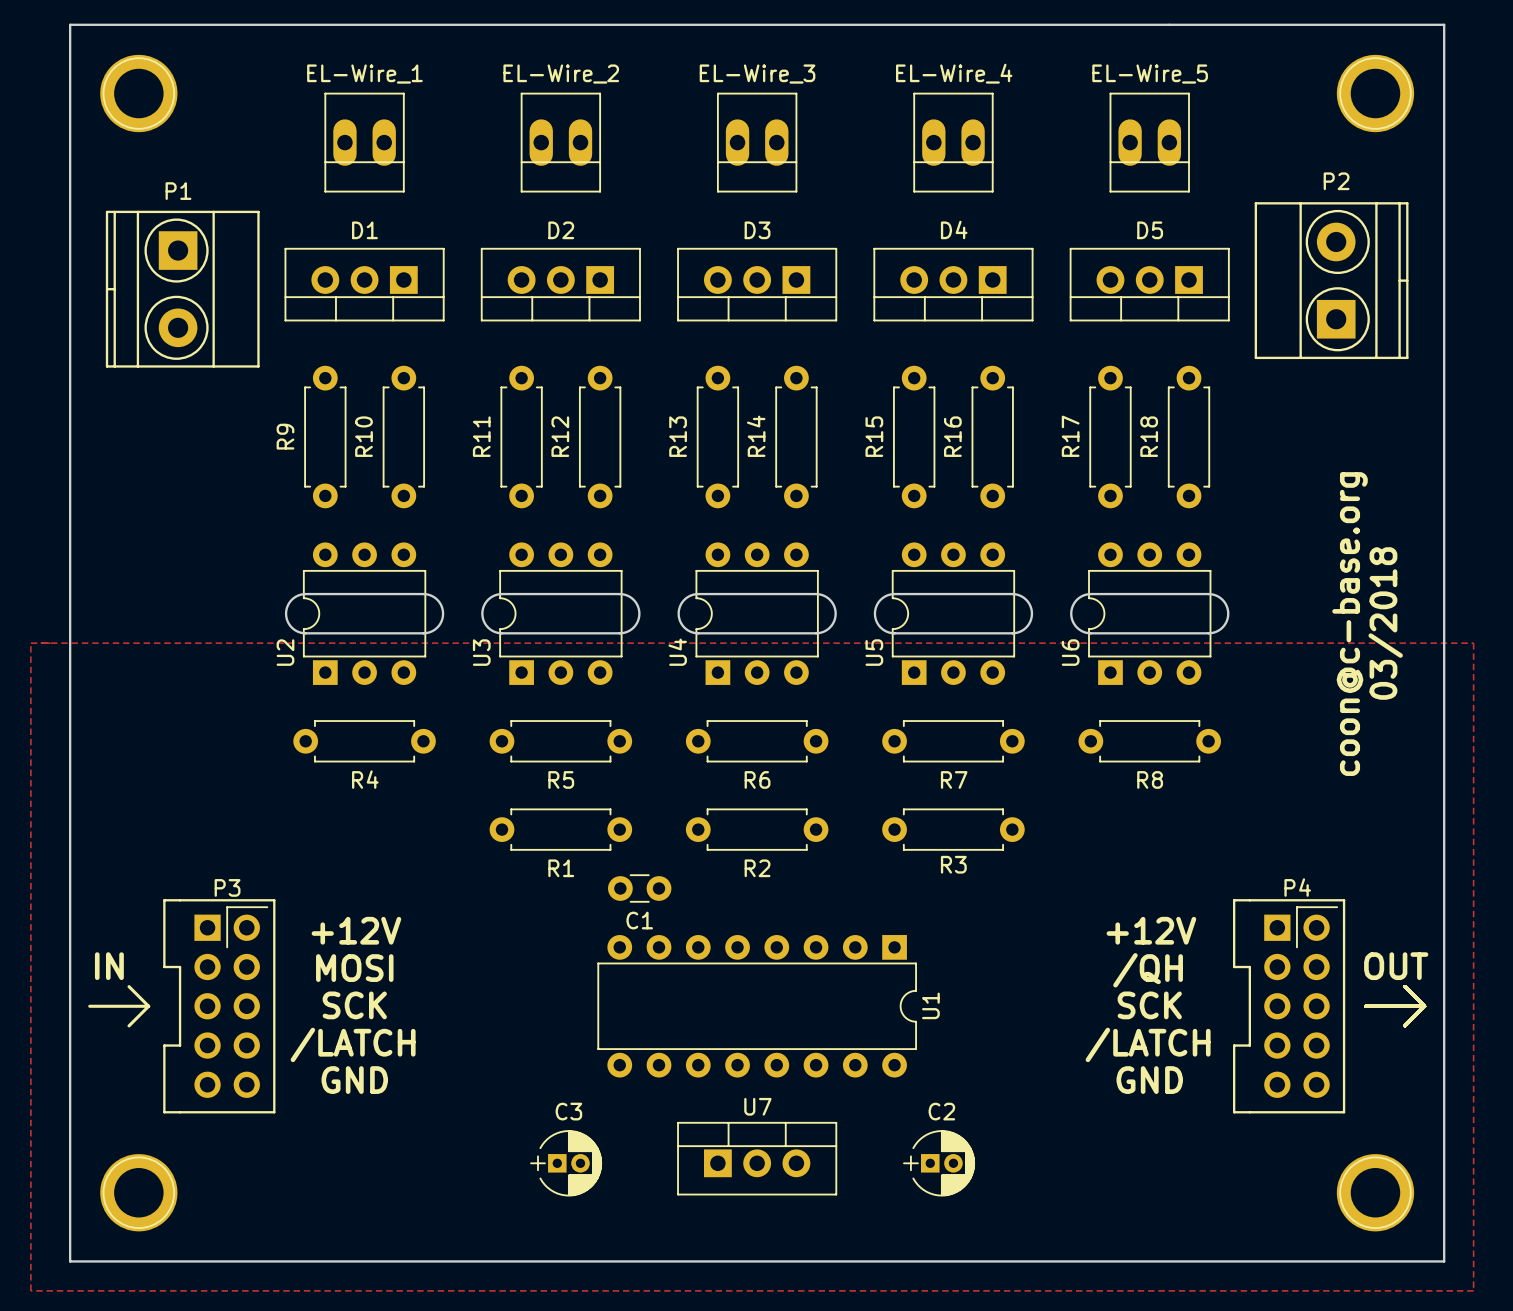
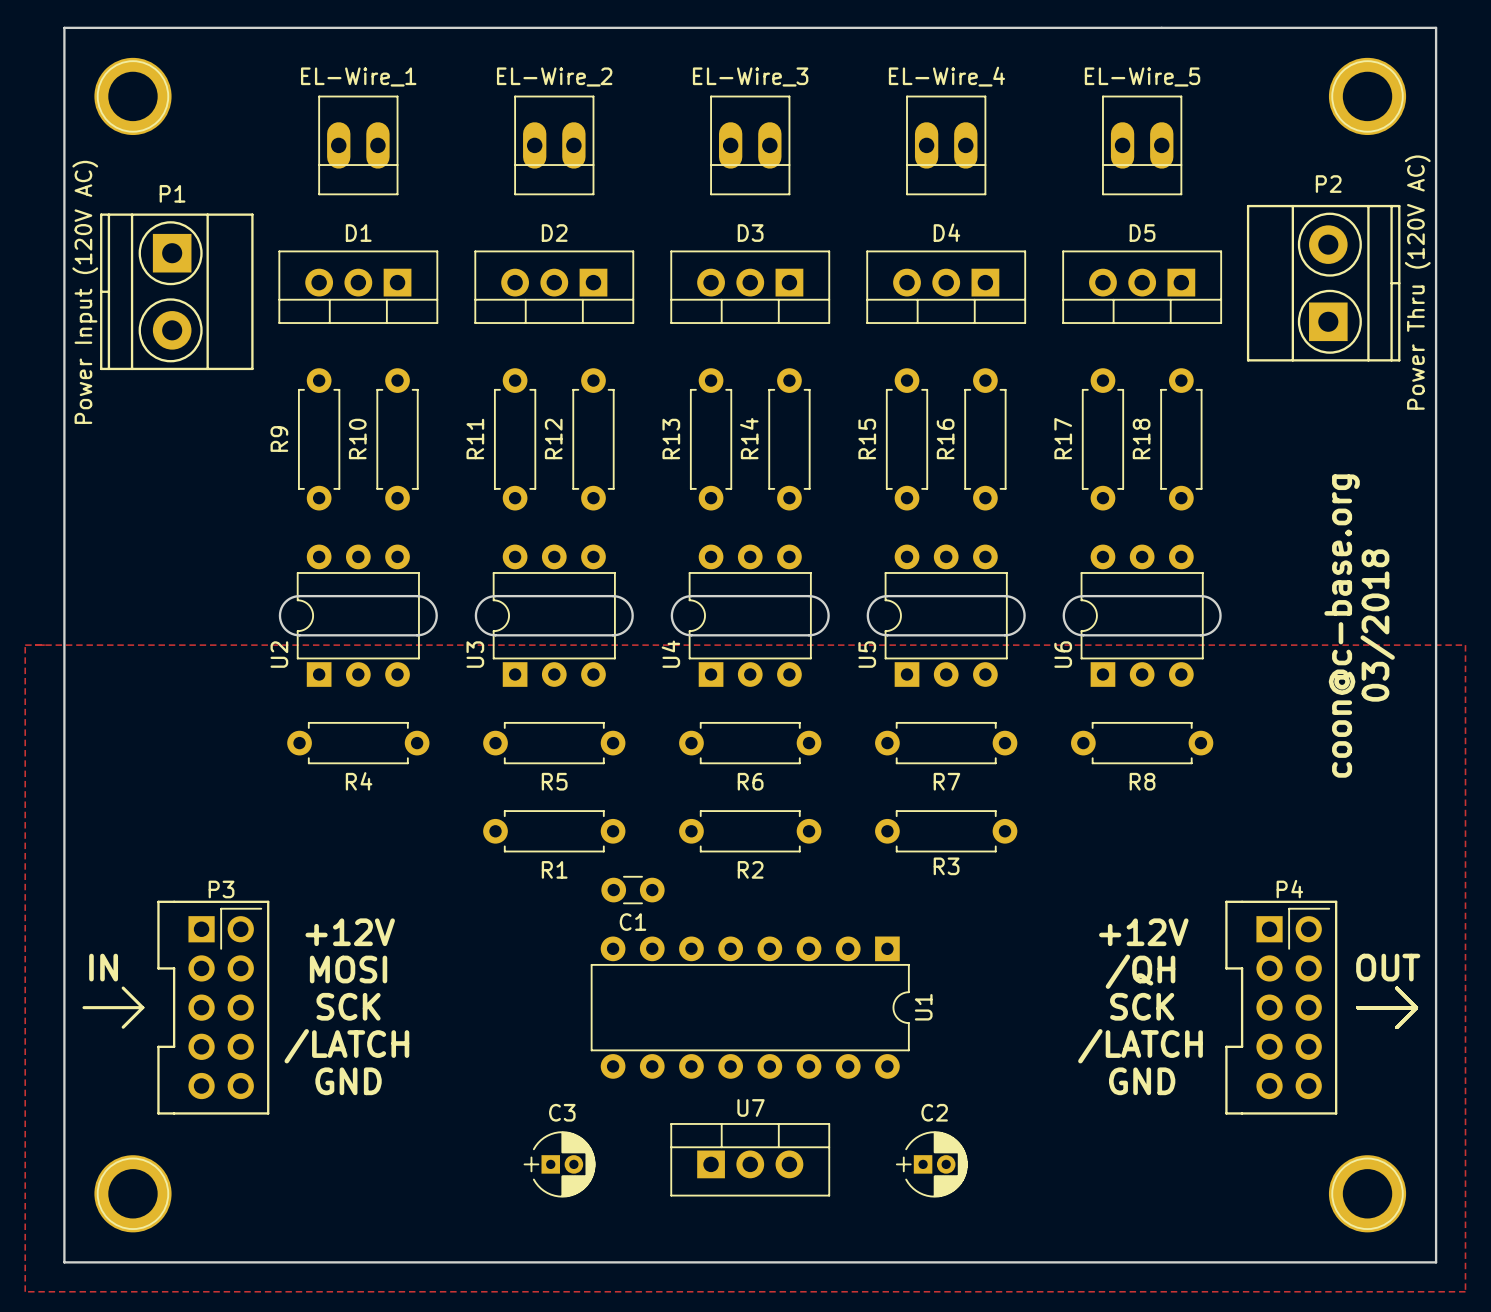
P2 value: none -> Power Thru (120V AC) (1417, 282)
P1 value: none -> Power Input (120V AC) (85, 292)

